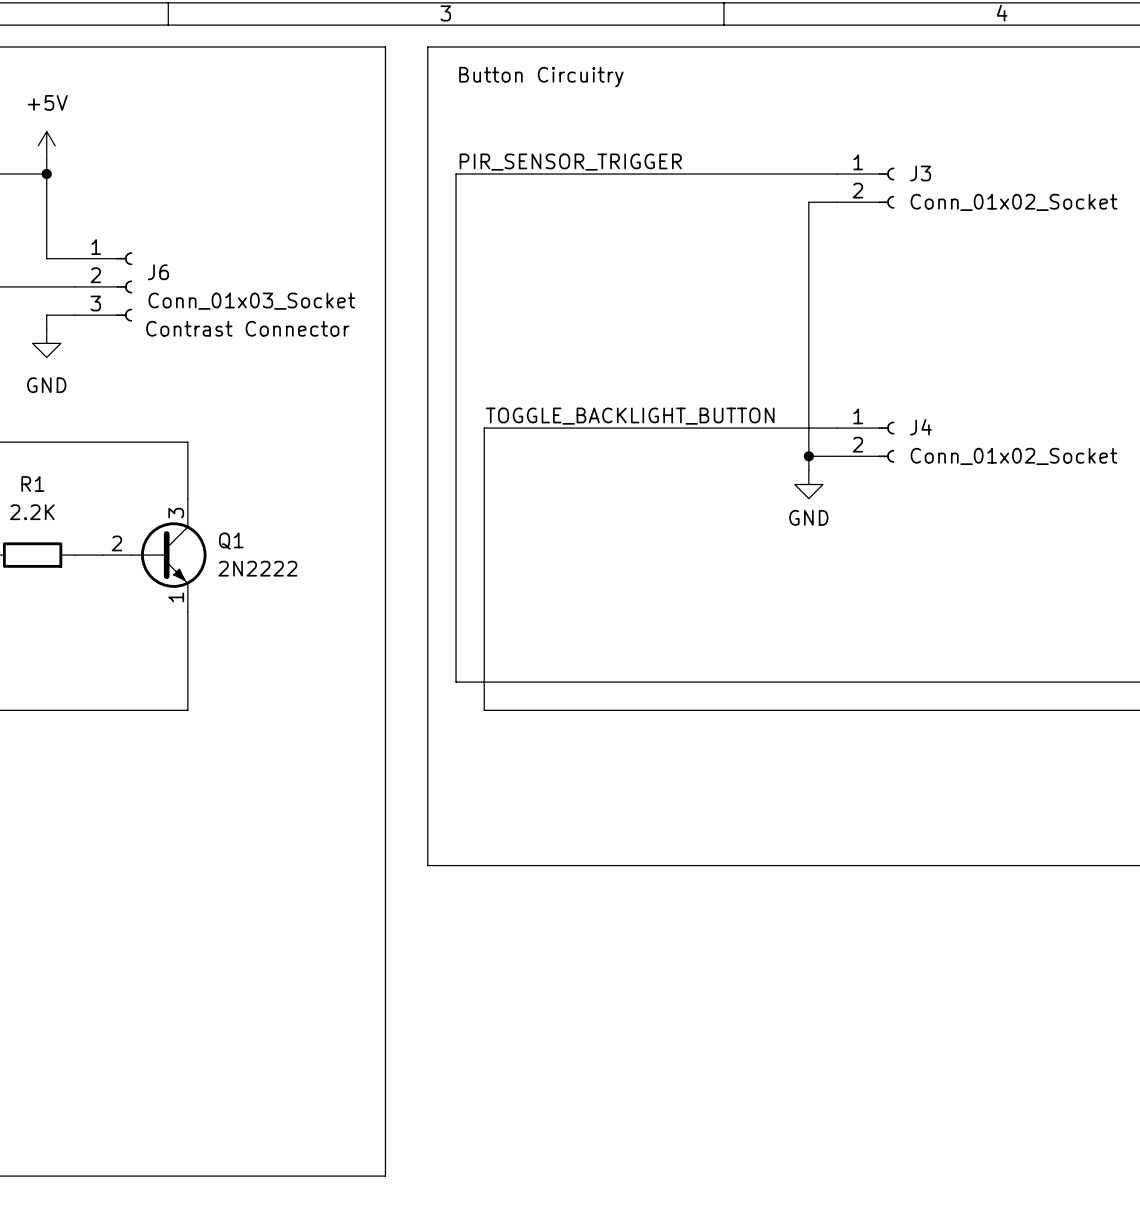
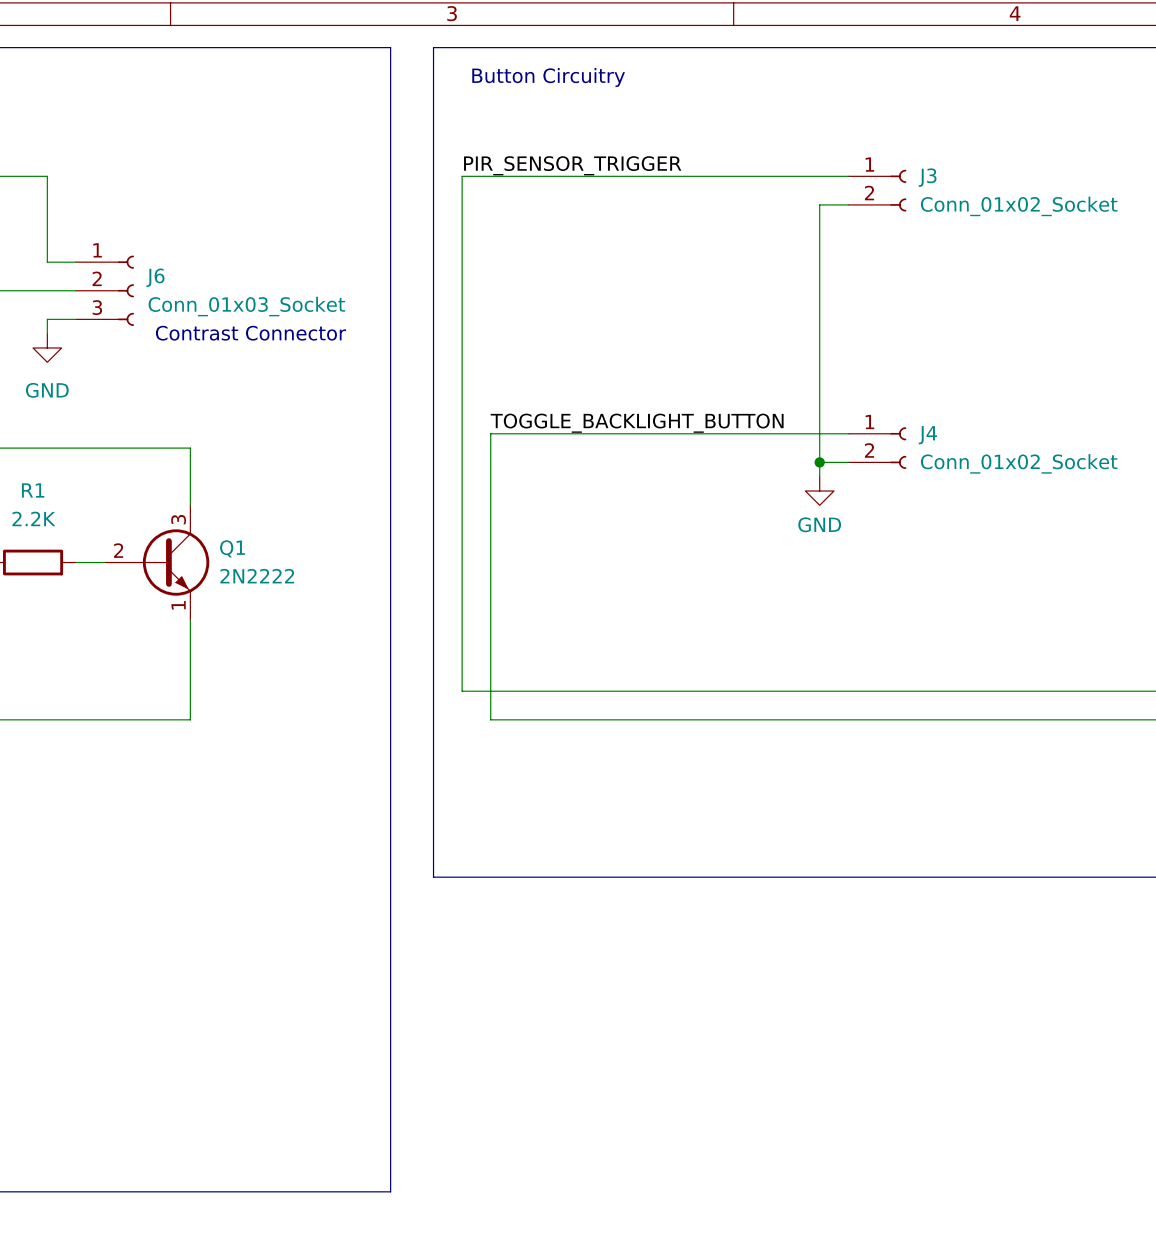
power symbol: +5V (46, 145) -> none
wire: (46, 159) (46, 174) -> none
junction: (46, 174) -> none

